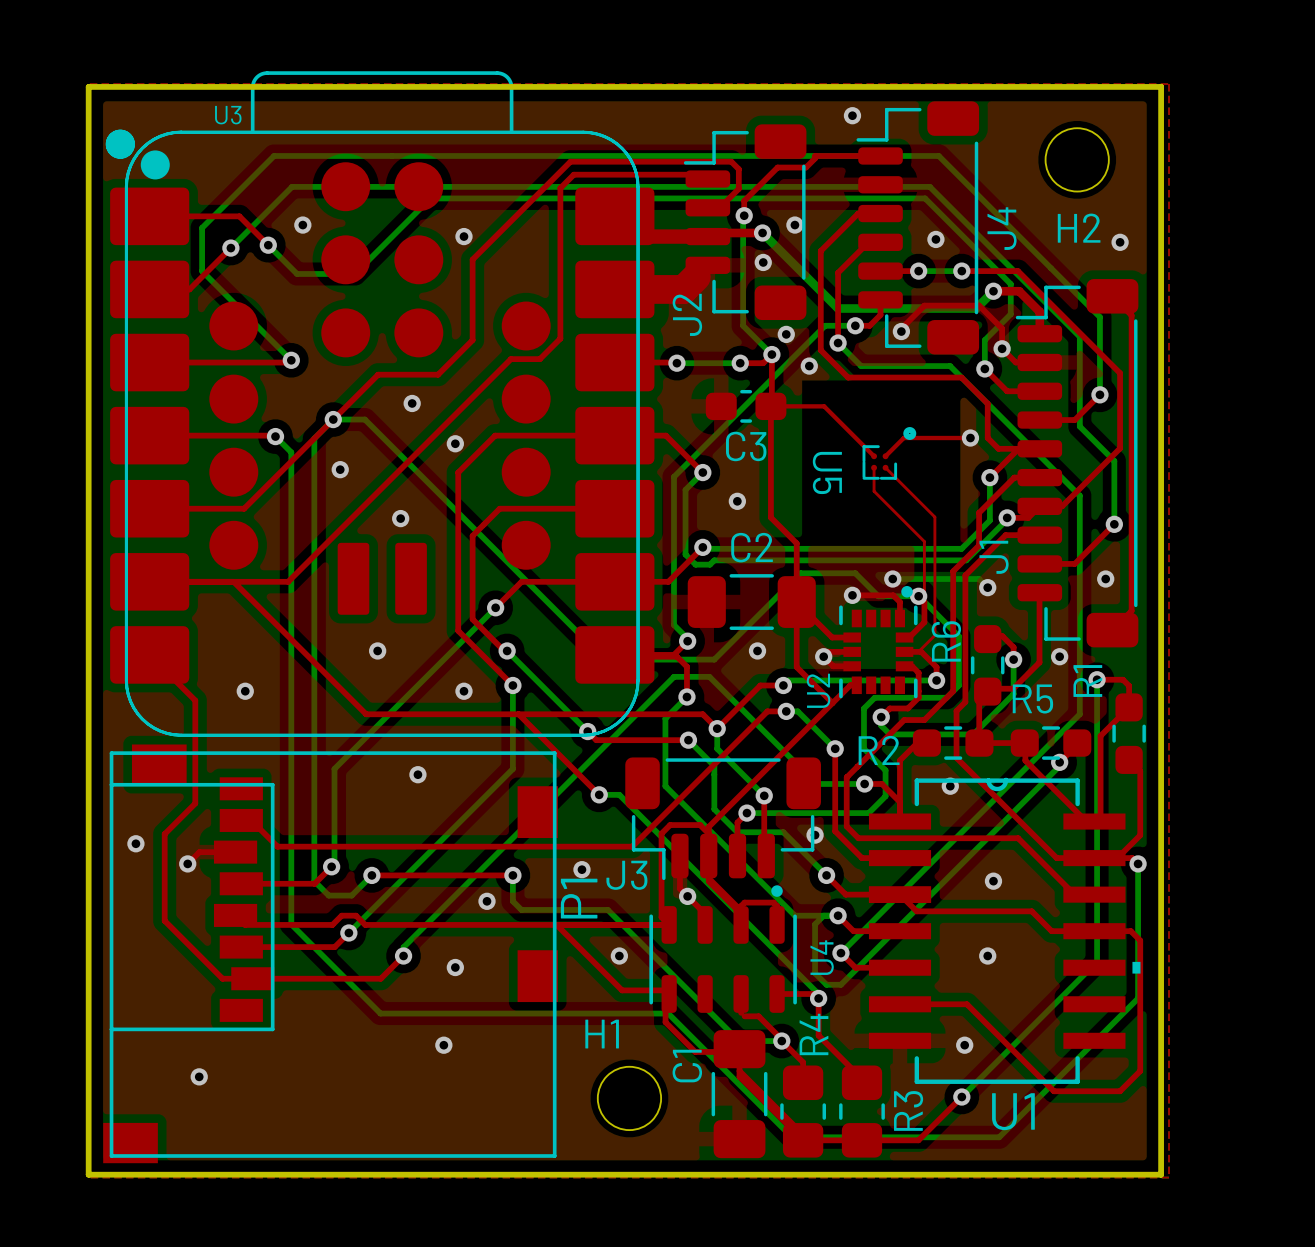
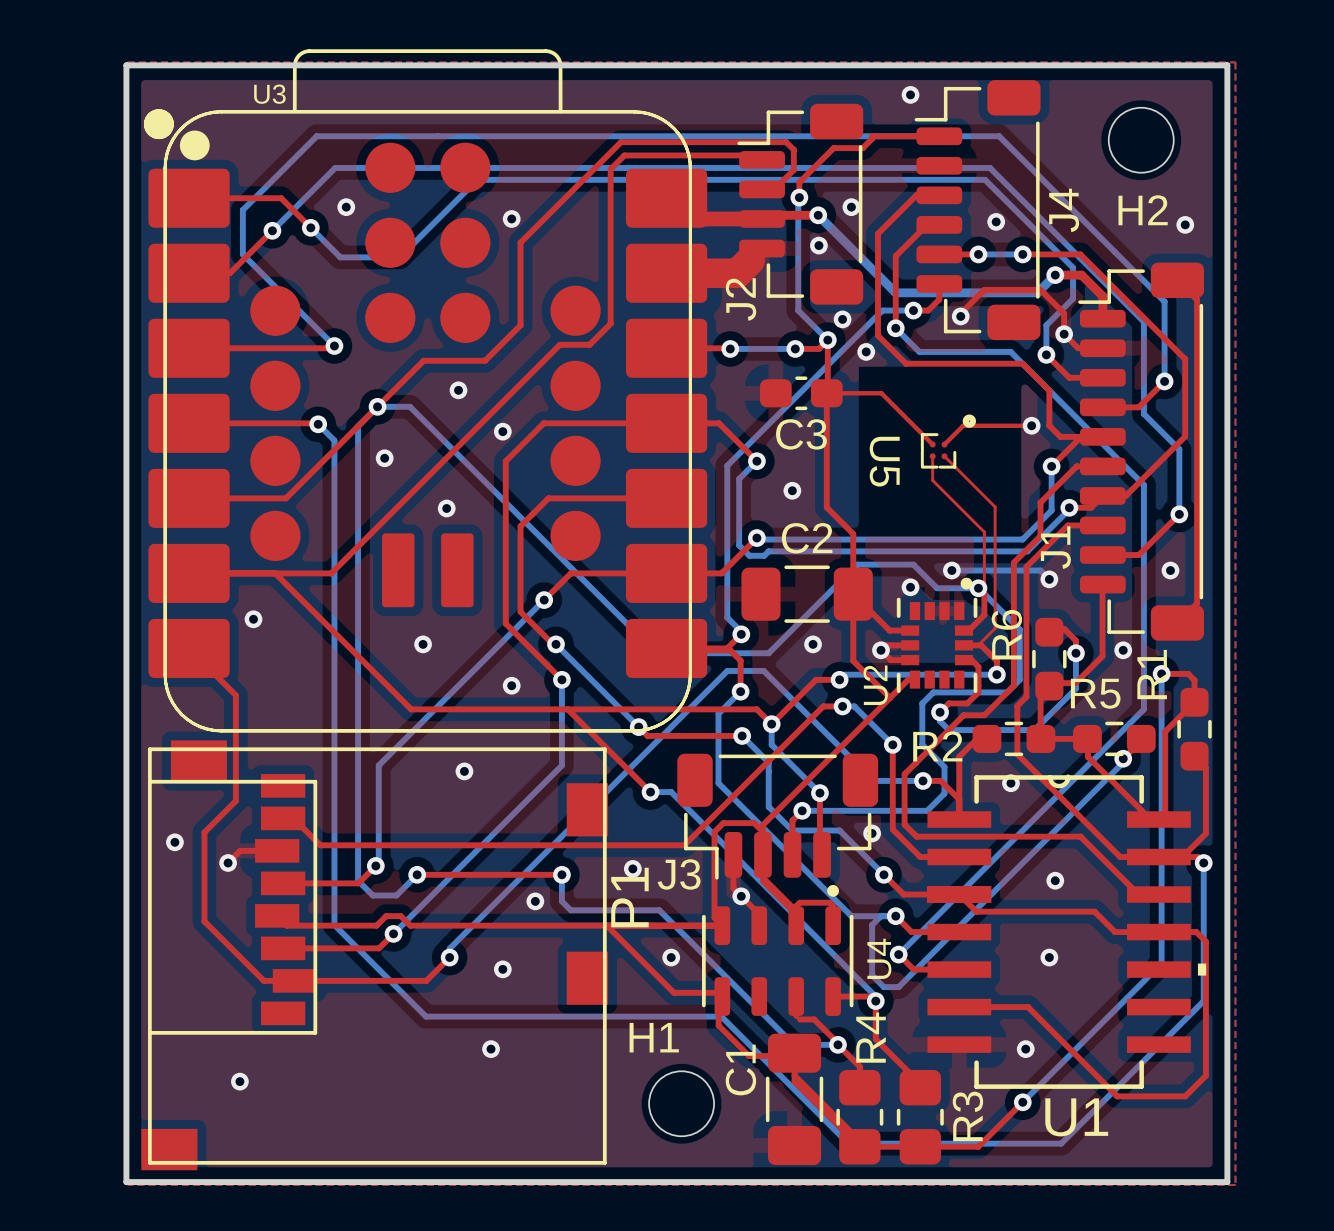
top track: (852, 595) (893, 595) (899, 602) (899, 618) -> none
via position: (245, 691) -> (253, 619)

